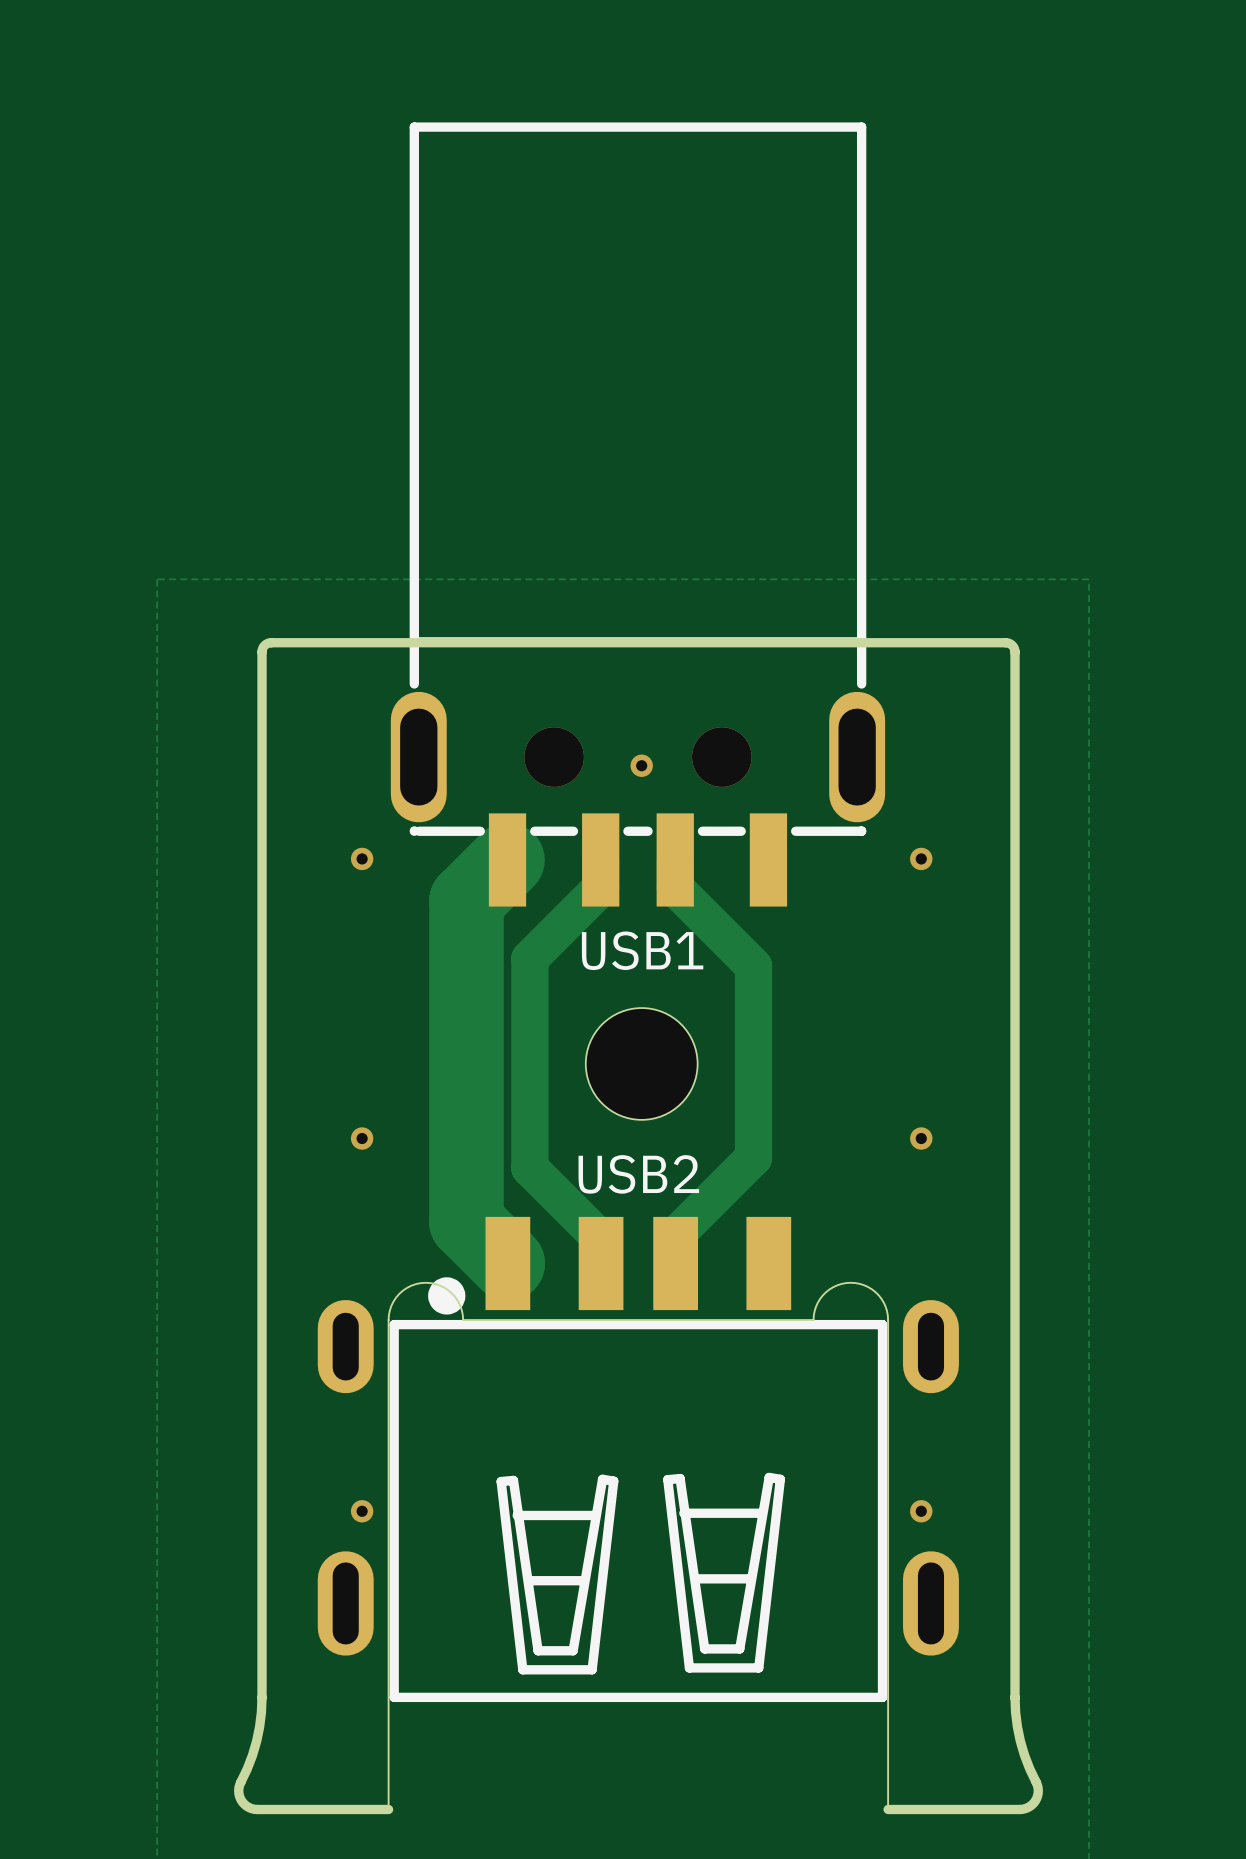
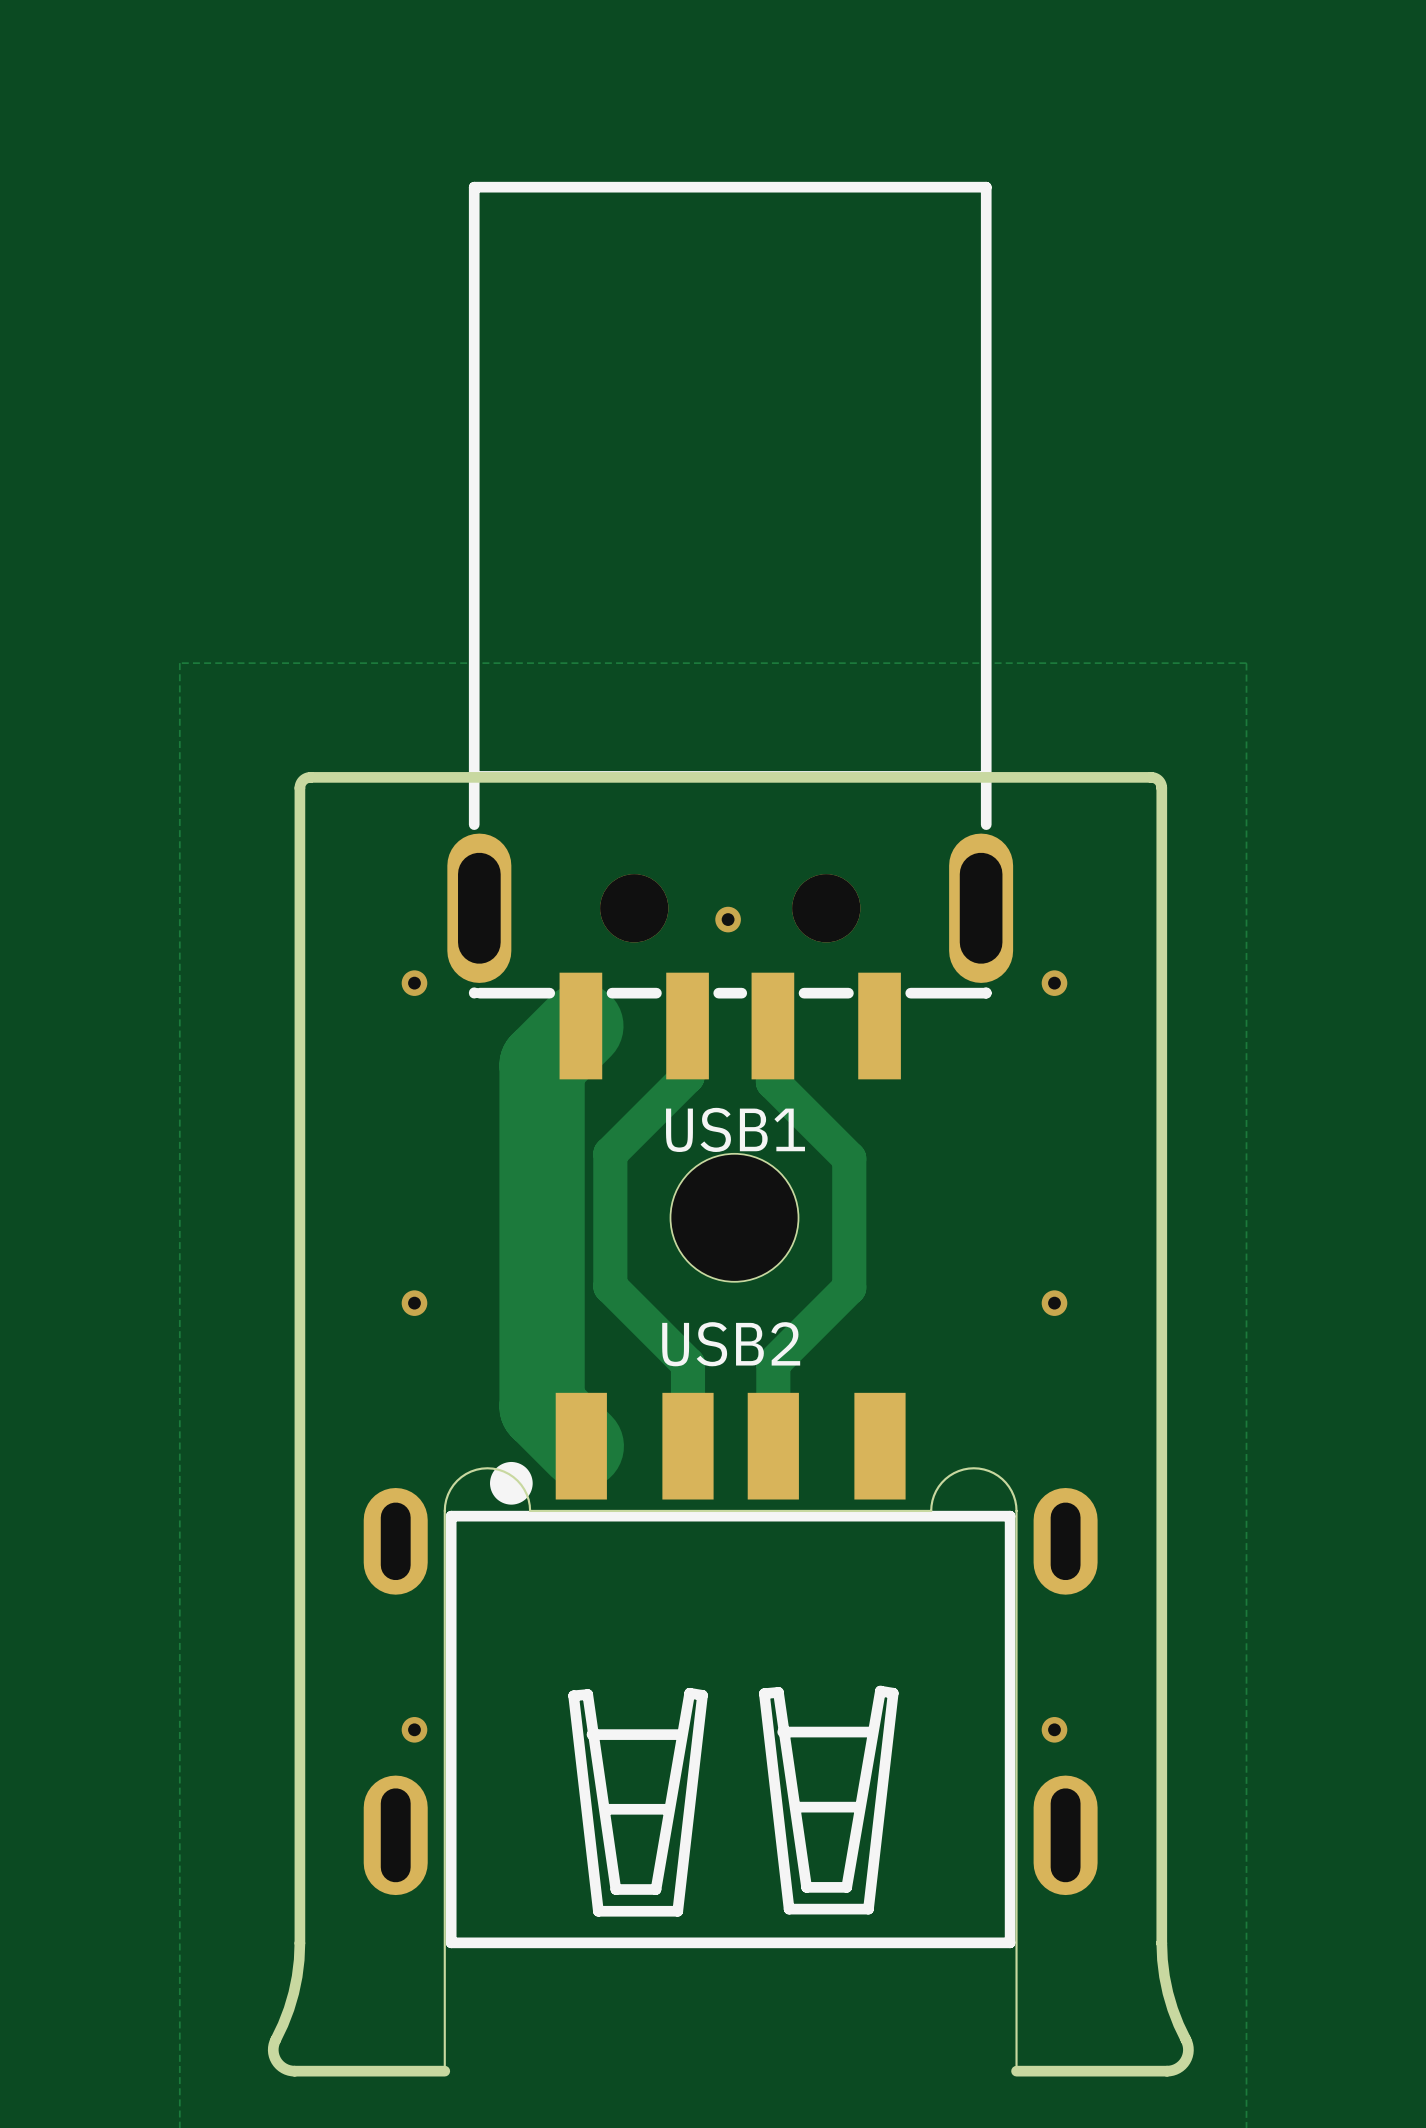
USB1 position: (637, 514) -> (730, 630)
board edge: (262, 688) (262, 649) (265, 644) (271, 642) (1006, 642) (1011, 644) (1014, 649) (1015, 688) -> (299, 788) (303, 780) (310, 777) (1151, 777) (1158, 780) (1161, 788)
via position: (641, 765) -> (728, 919)
track: (507, 859) (466, 900) (466, 1222) (473, 1229) -> (580, 1026) (542, 1064) (542, 1406)
track: (600, 859) (600, 887) (529, 958) (529, 1168) (601, 1239) -> (687, 1026) (687, 1076) (610, 1153) (610, 1286) (687, 1364) (687, 1418)
track: (675, 859) (675, 887) (753, 966) (753, 1157) (675, 1235) -> (772, 1026) (772, 1082) (849, 1158) (849, 1287) (773, 1363) (773, 1414)

